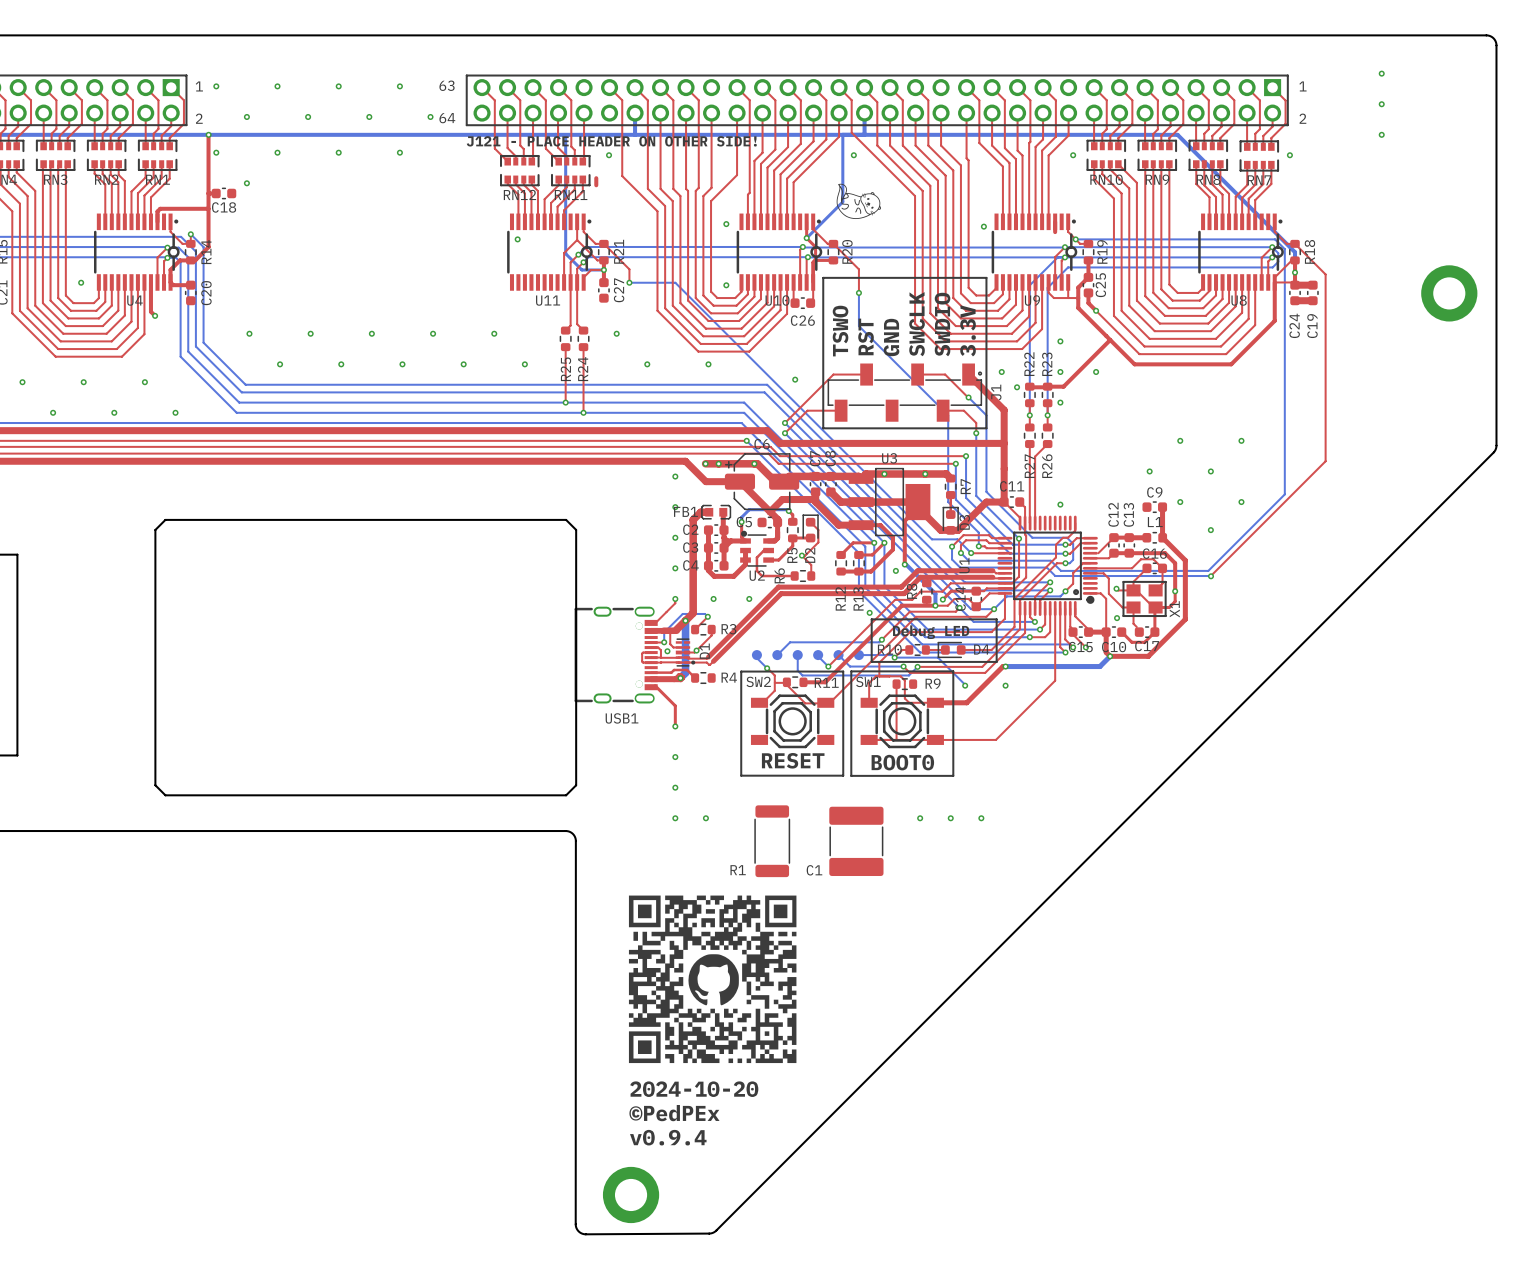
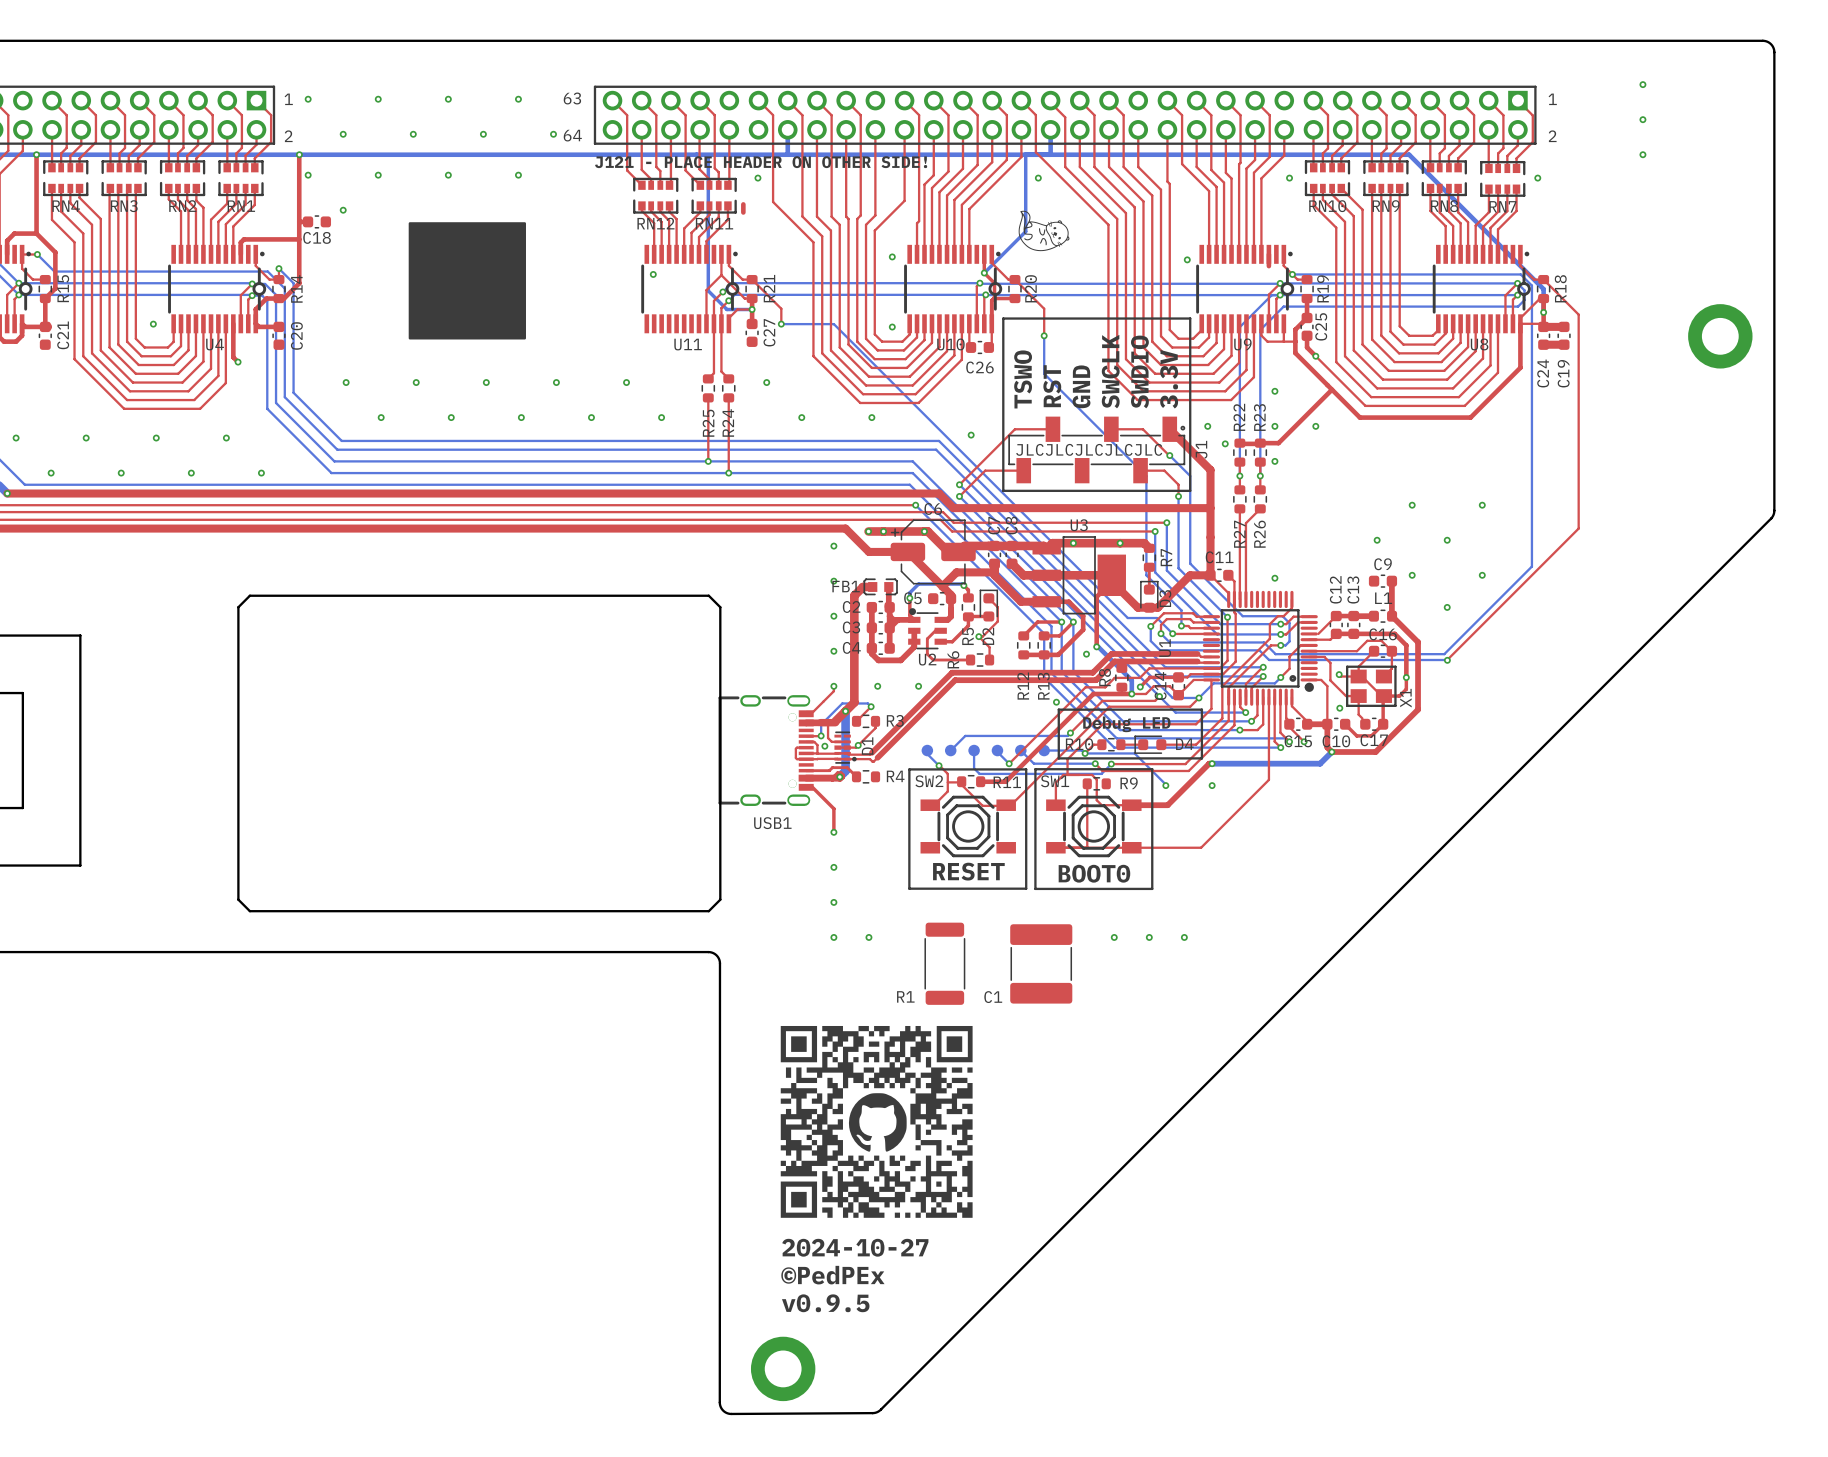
drawing: none -> [408, 222, 526, 340]
text: none -> JLCJLCJLCJLCJLC (1089, 449)
text: 2024-10-20 (694, 1089) -> 2024-10-27 (855, 1247)
text: v0.9.4 (668, 1137) -> v0.9.5 (825, 1303)

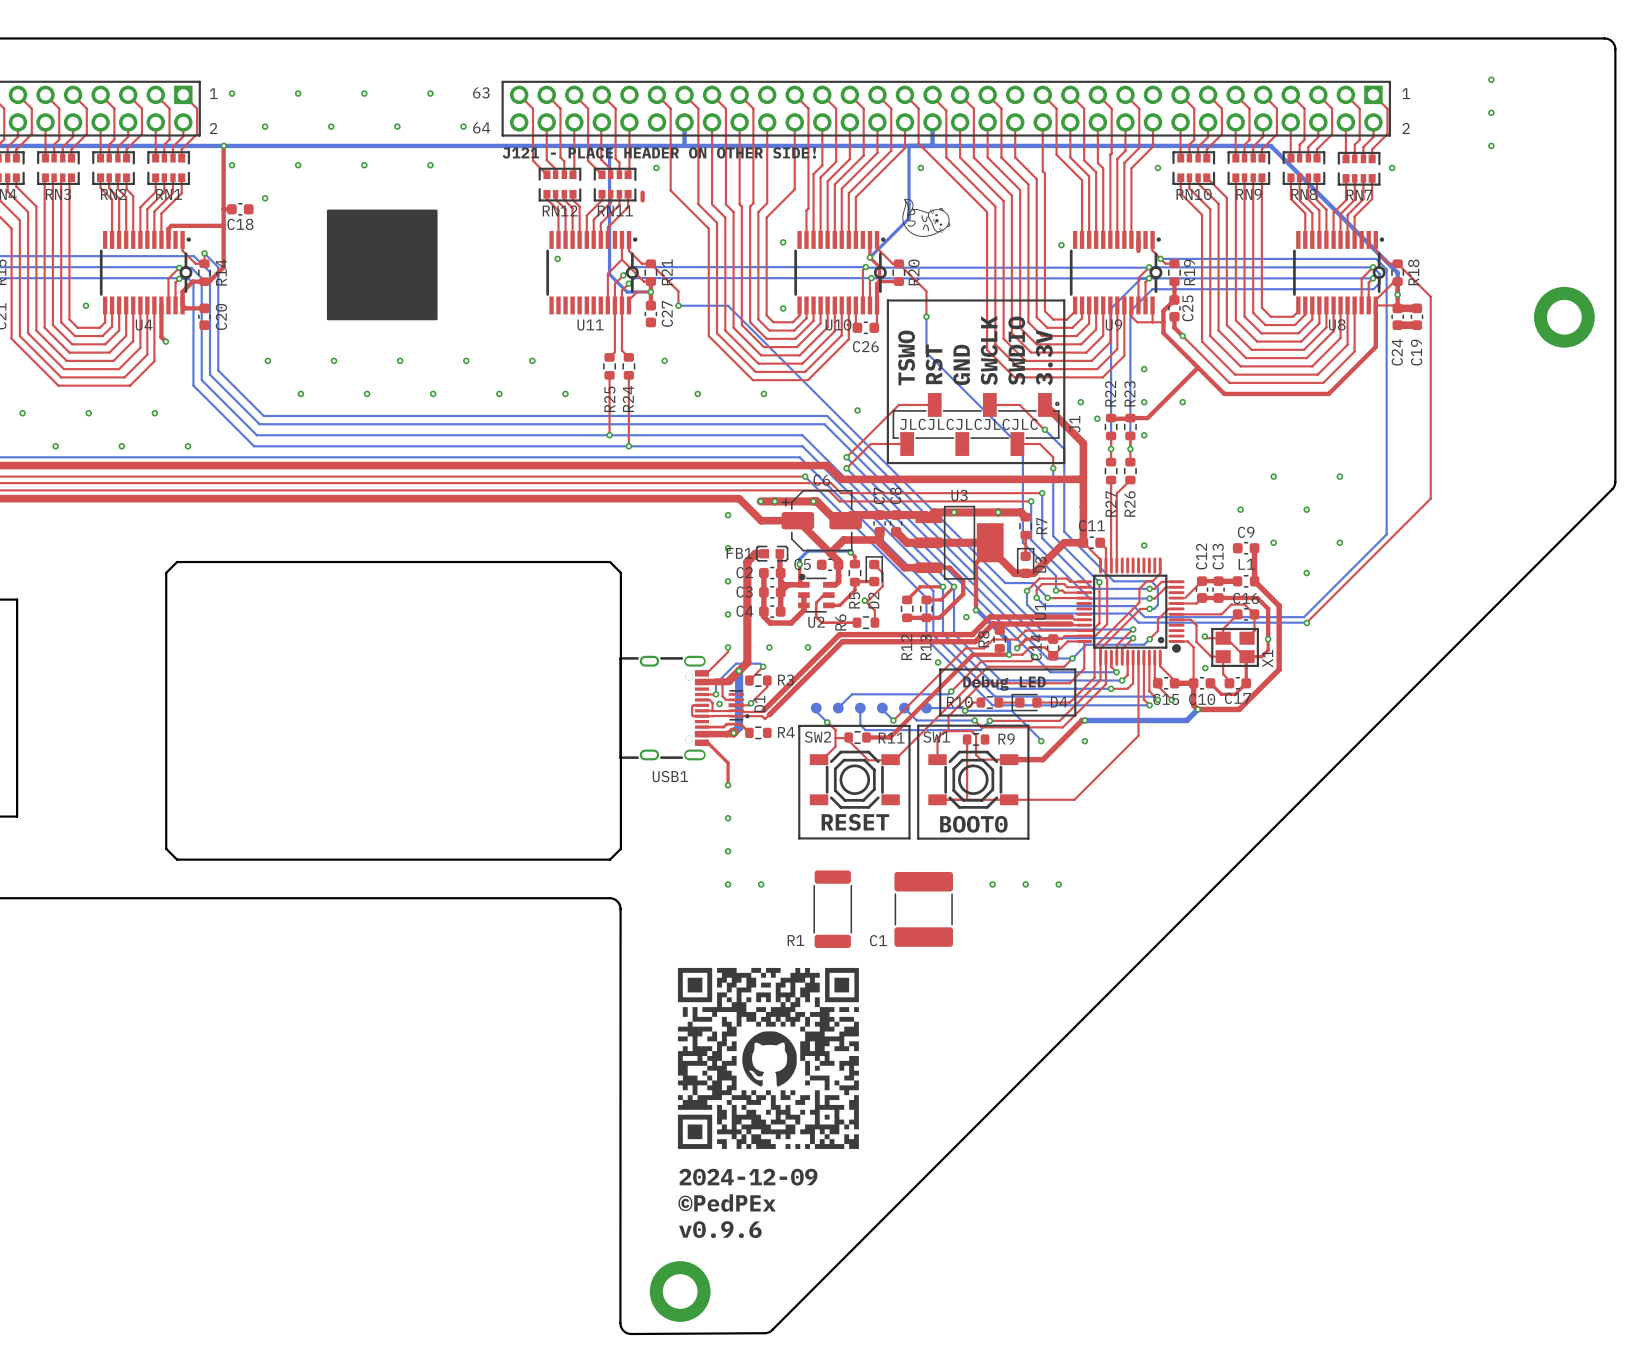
text: 2024-10-27 (855, 1247) -> 2024-12-09 (748, 1177)
text: v0.9.5 (825, 1303) -> v0.9.6 (720, 1229)

